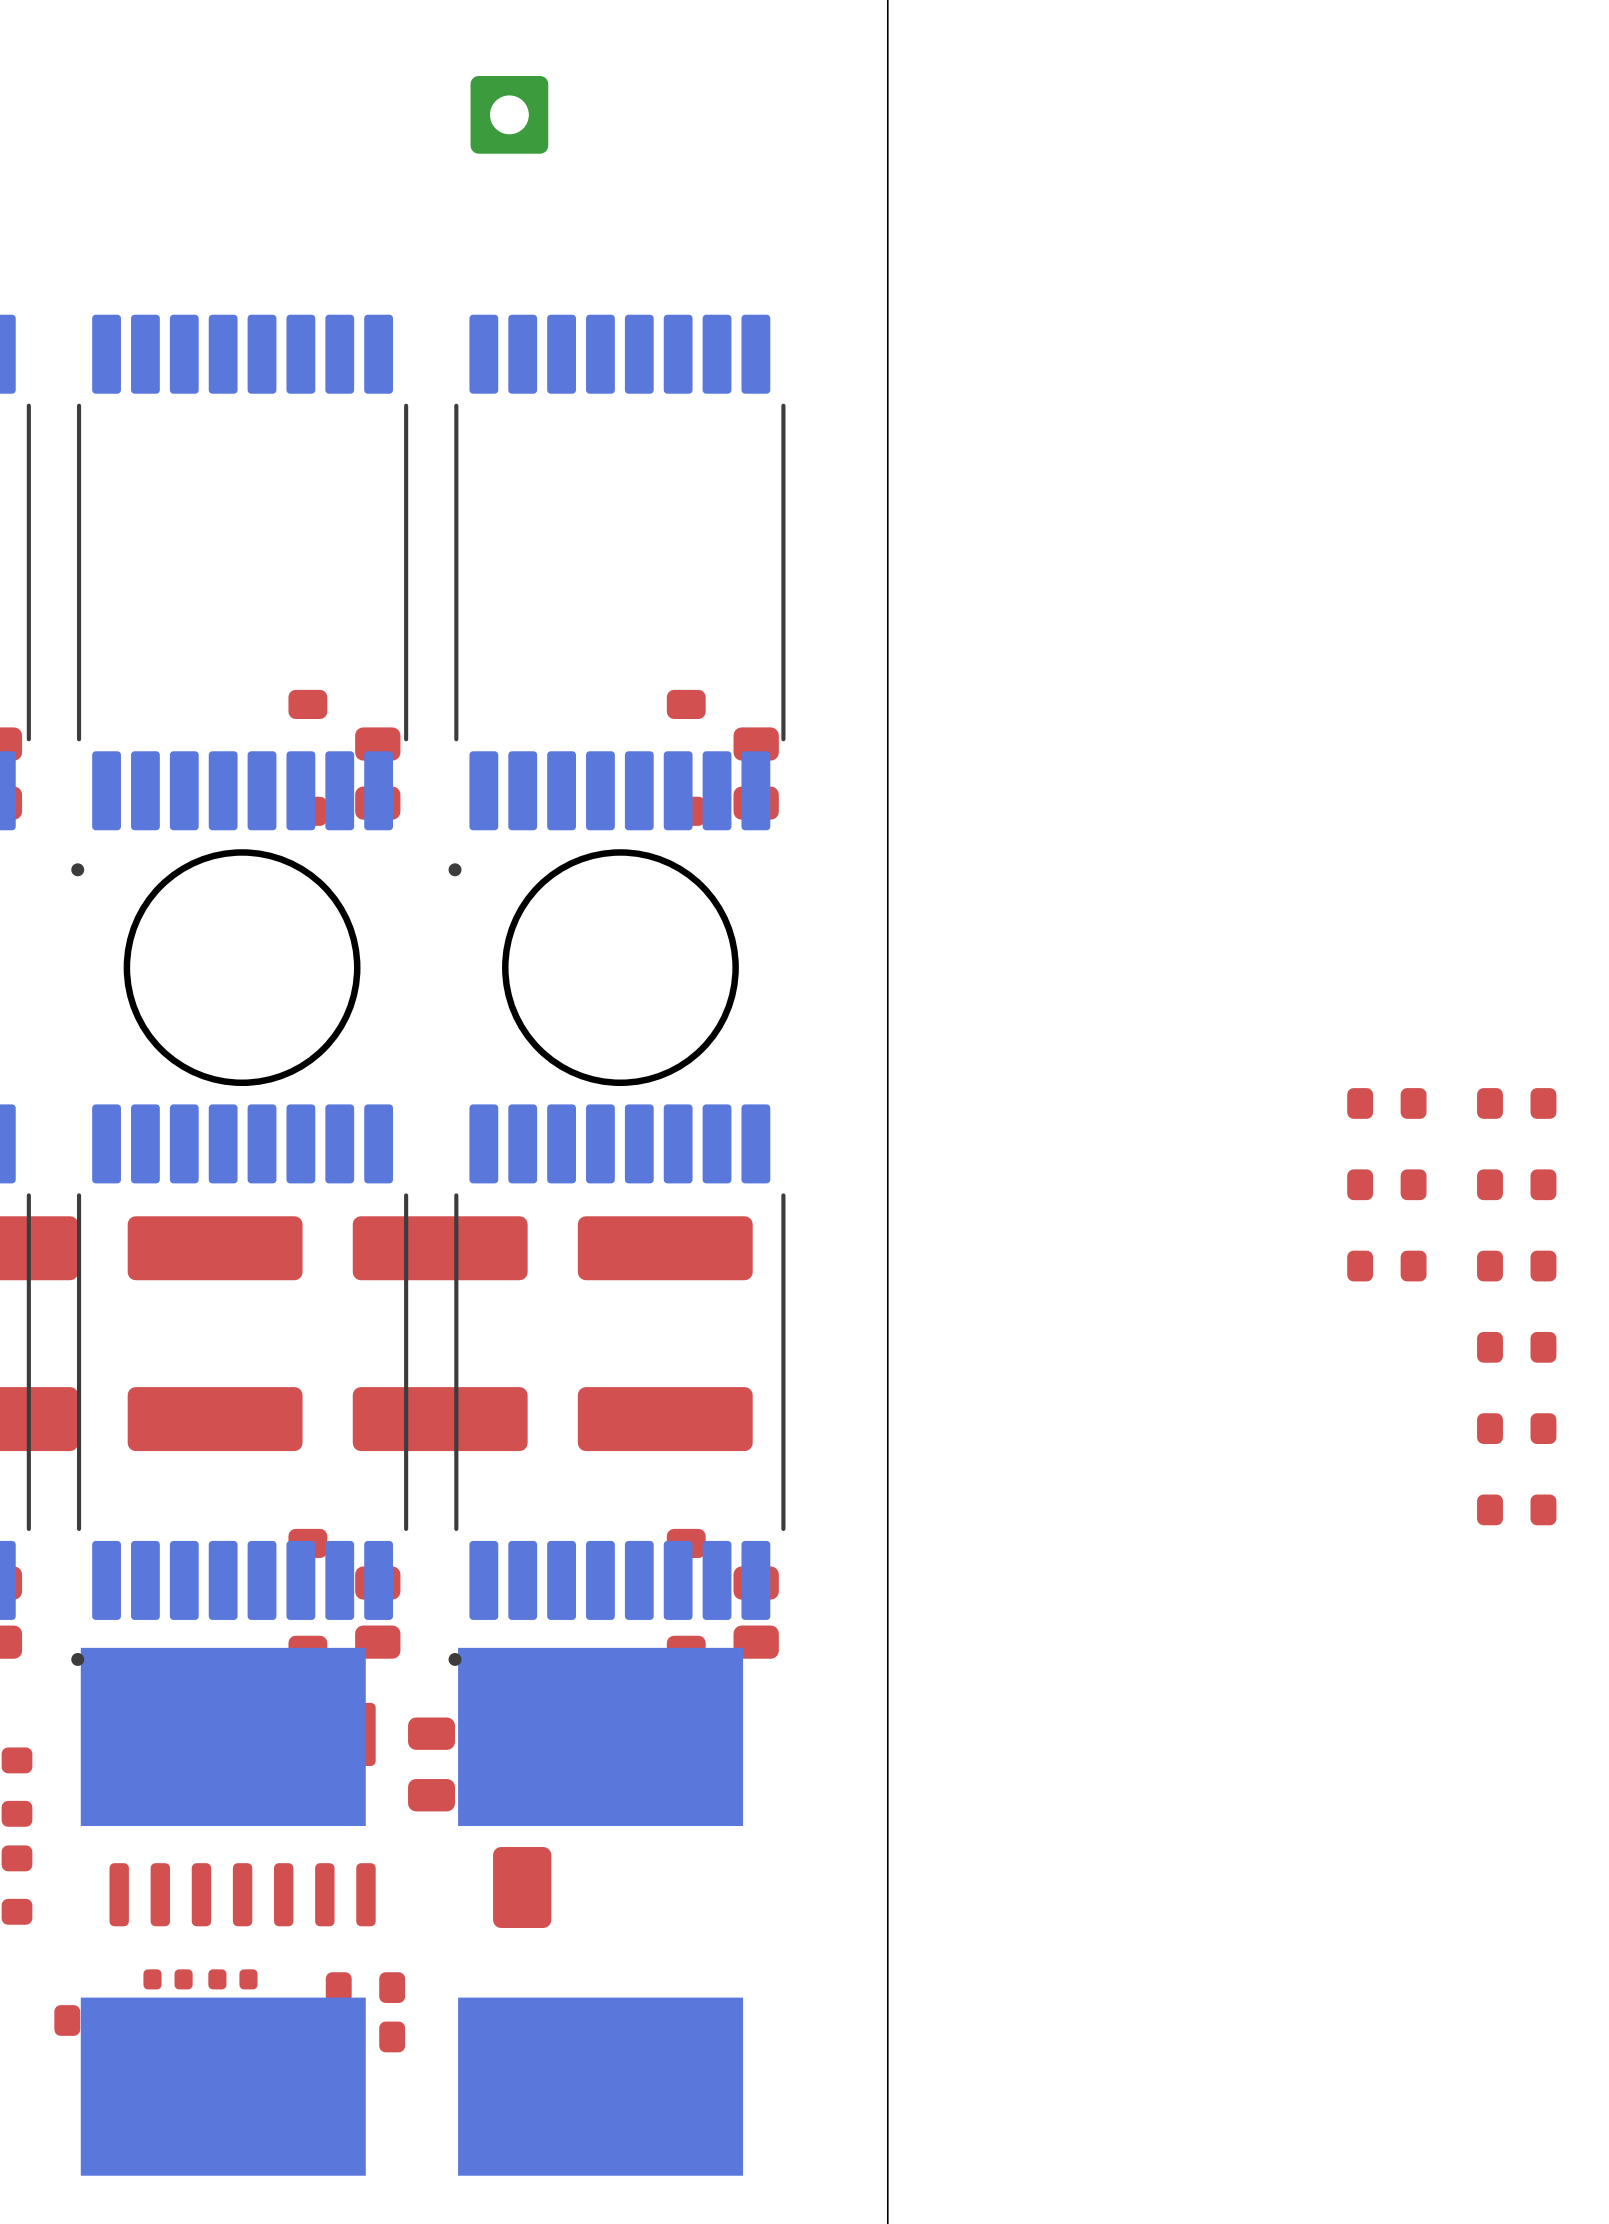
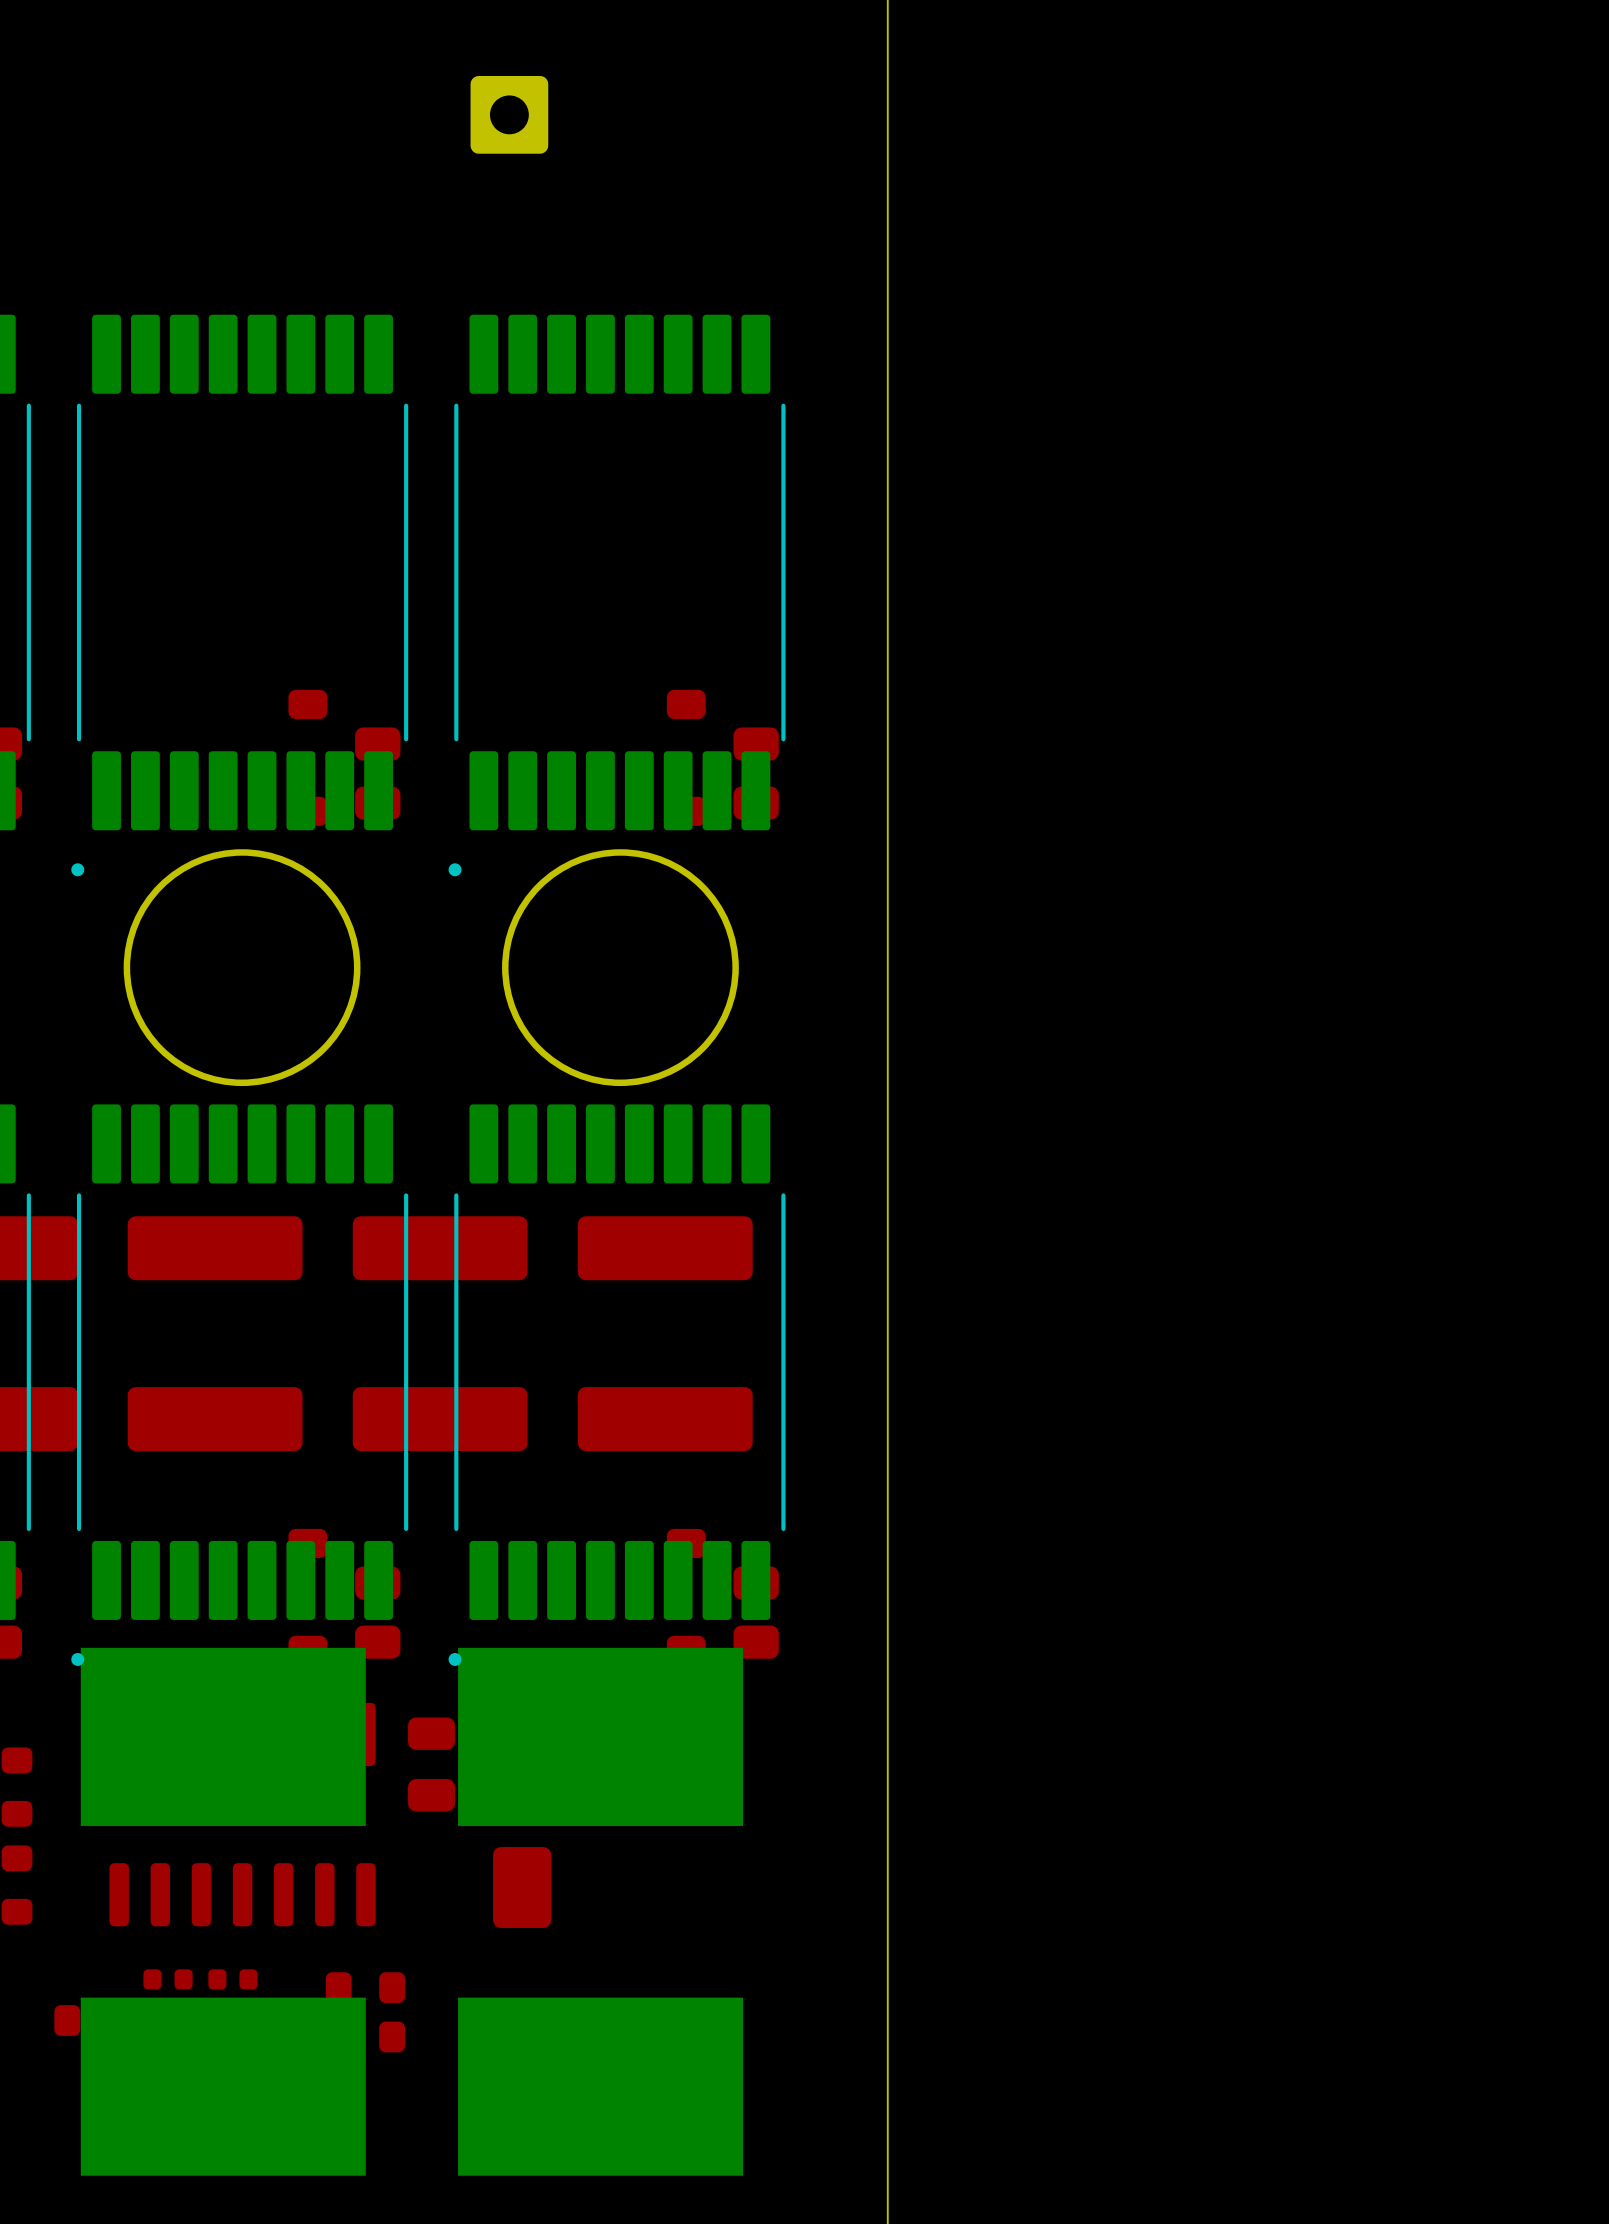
part: (1386, 1103) -> none
part: (1516, 1103) -> none
part: (1386, 1184) -> none
part: (1516, 1184) -> none
part: (1386, 1266) -> none
part: (1516, 1266) -> none
part: (1516, 1347) -> none
part: (1516, 1428) -> none
part: (1516, 1509) -> none

